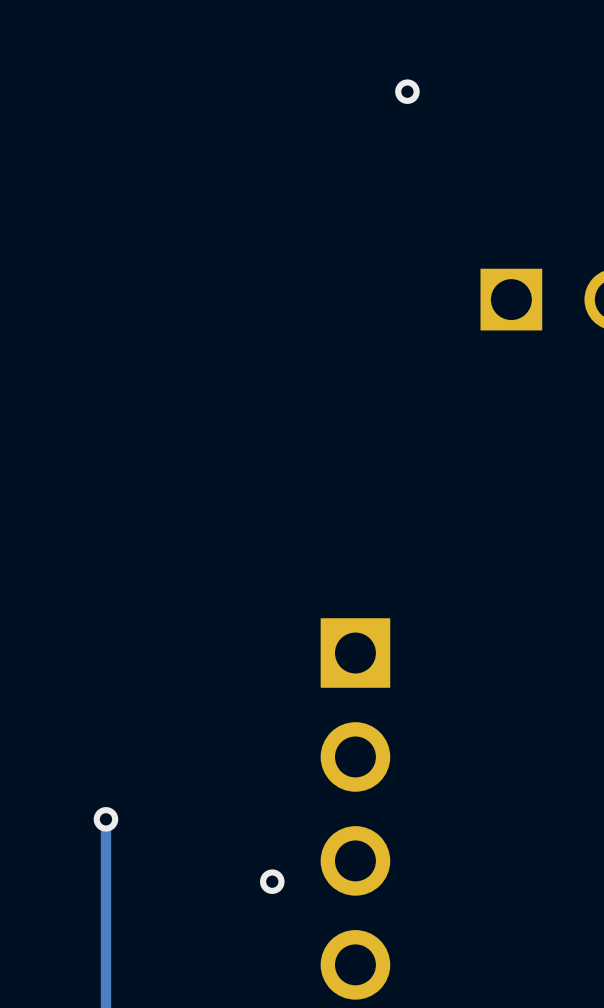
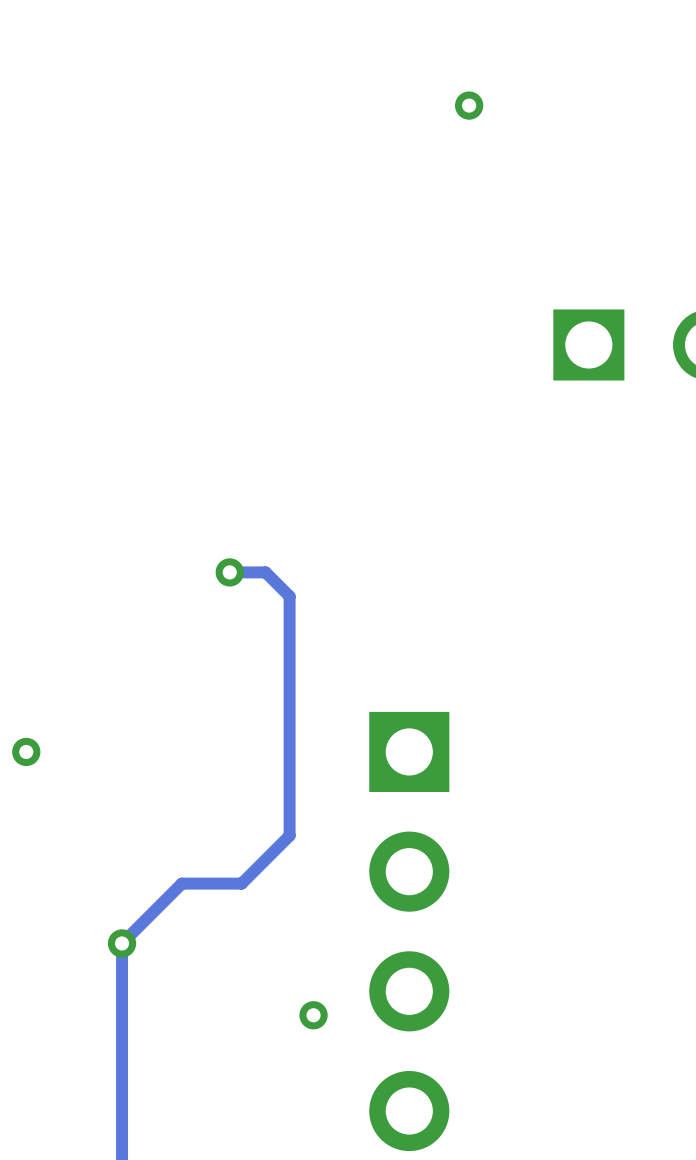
track: none -> (229, 572) (265, 572) (289, 596) (289, 835) (241, 883) (181, 883) (122, 943)
via: none -> (229, 572)
via: none -> (26, 751)

